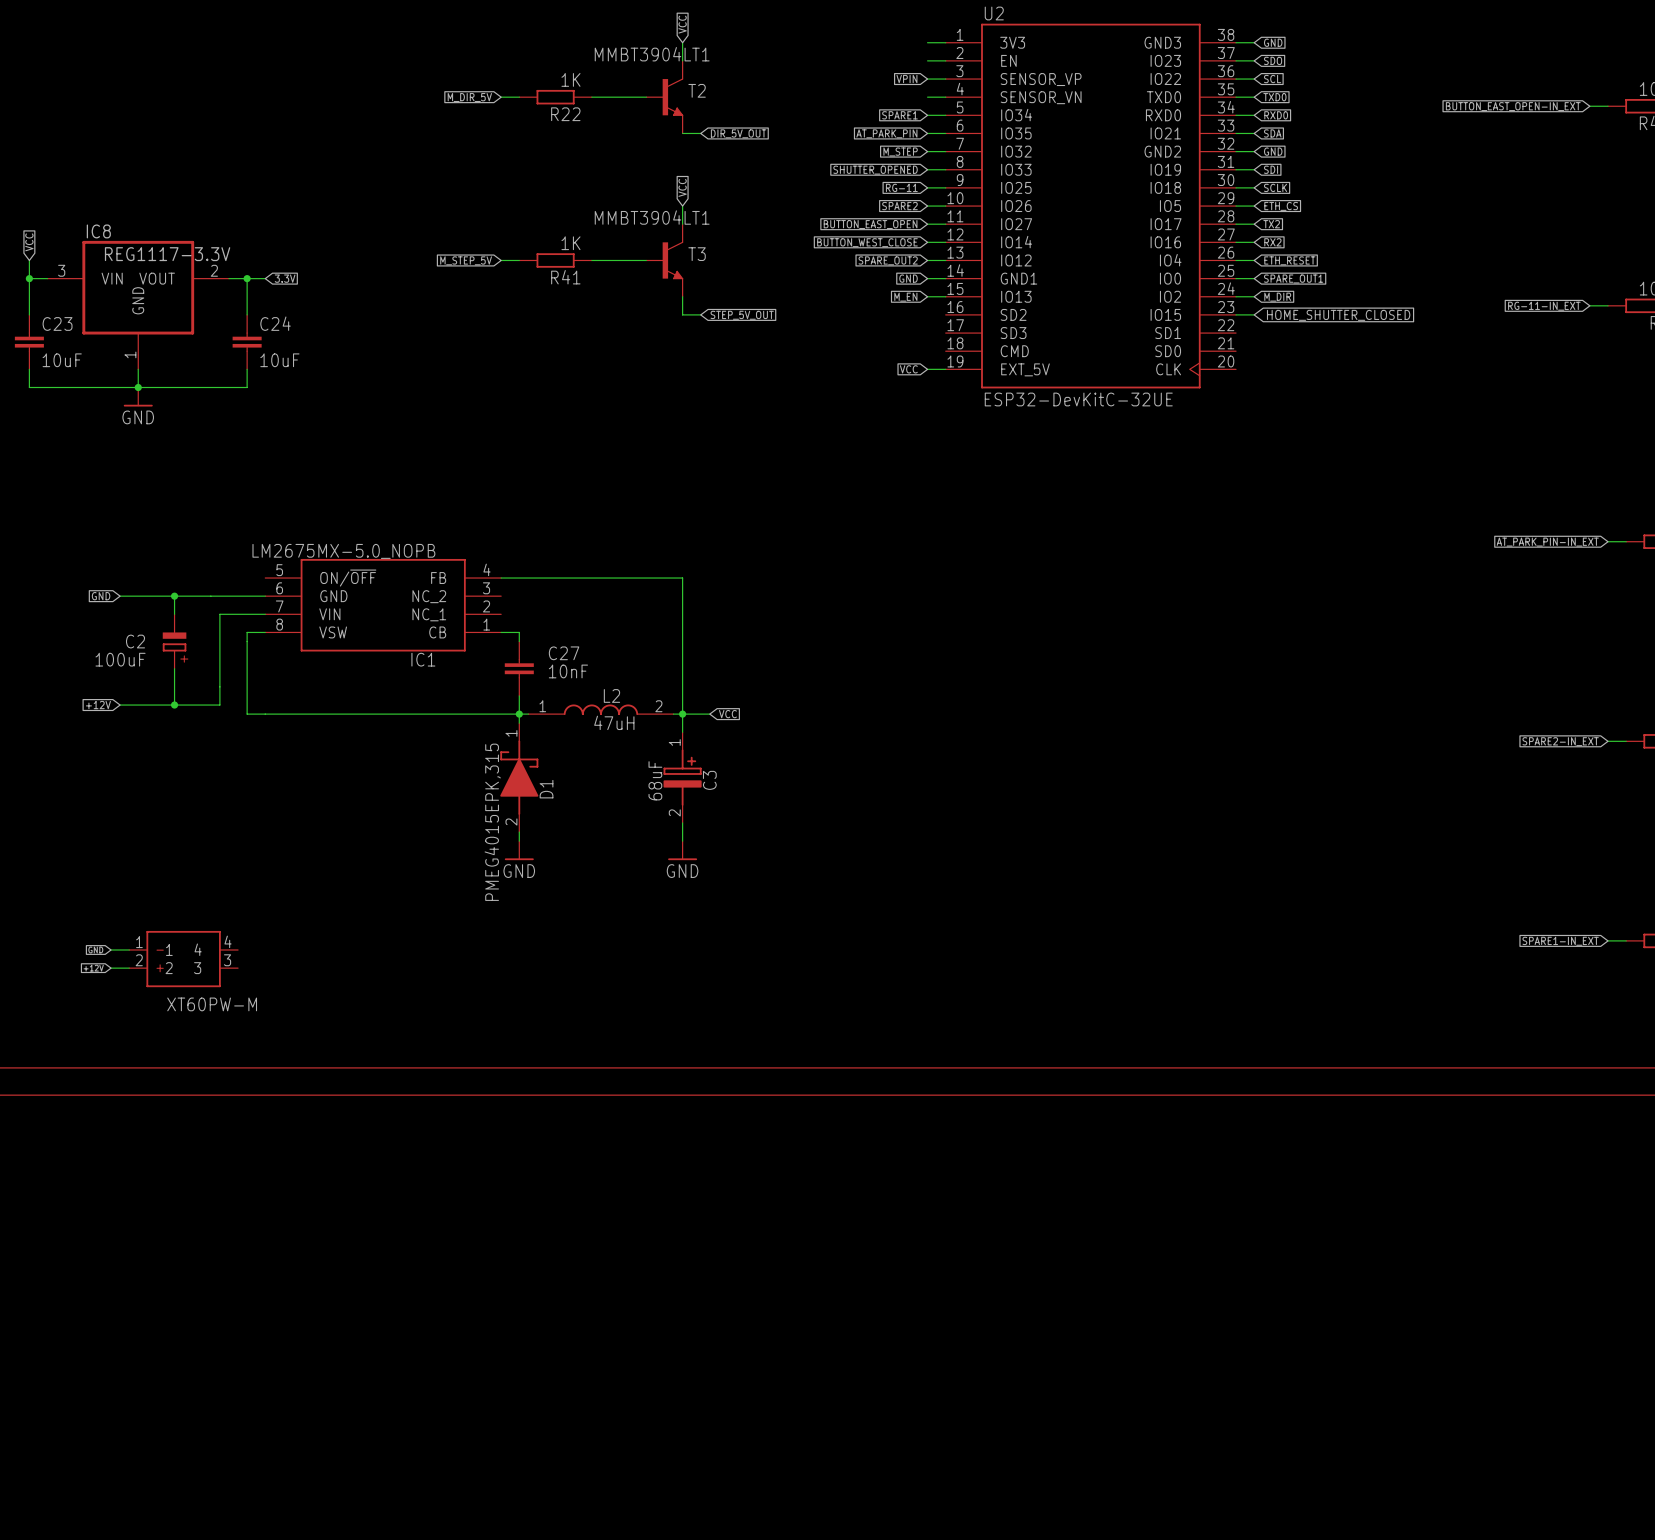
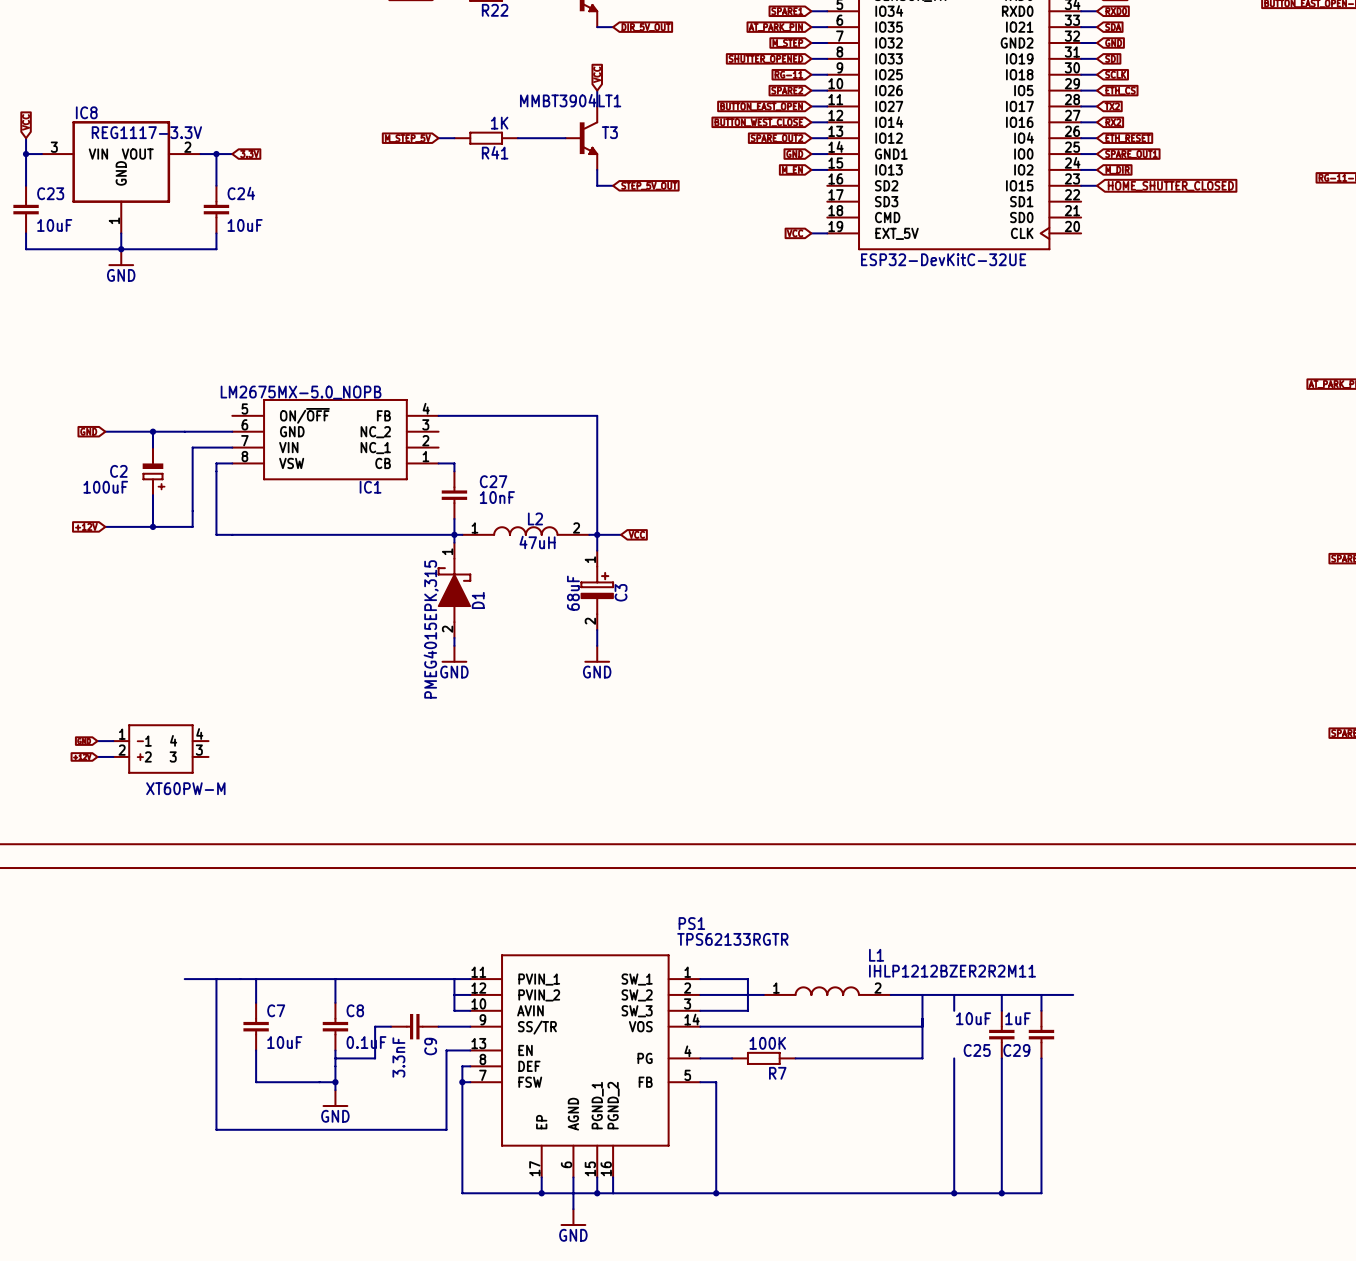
wire: none -> (184, 979) (470, 979)
wire: none -> (216, 979) (216, 1129) (446, 1129) (446, 1050) (470, 1050)
wire: none -> (256, 979) (256, 1002)
wire: none -> (335, 979) (335, 1002)
wire: none -> (454, 979) (454, 1010) (470, 1010)
wire: none -> (700, 979) (747, 979) (747, 1010) (700, 1010)
L1: none -> IHLP1212BZER2R2M11 (827, 991)
wire: none -> (454, 994) (470, 994)
wire: none -> (700, 994) (763, 994)
wire: none -> (890, 994) (1073, 994)
wire: none -> (922, 994) (922, 1058) (795, 1058)
wire: none -> (954, 994) (954, 1010)
wire: none -> (1001, 994) (1001, 1010)
wire: none -> (1041, 994) (1041, 1010)
C7: none -> 10uF (256, 1026)
C8: none -> 0.1uF (335, 1026)
wire: none -> (390, 1026) (375, 1026) (375, 1058) (335, 1058)
C9: none -> 3.3nF (414, 1026)
wire: none -> (438, 1026) (470, 1026)
wire: none -> (700, 1026) (922, 1026)
C25: none -> 10uF (1001, 1034)
C29: none -> 1uF (1041, 1034)
wire: none -> (256, 1050) (256, 1082) (335, 1082)
wire: none -> (335, 1050) (335, 1090)
wire: none -> (700, 1058) (732, 1058)
R7: none -> 100K (763, 1058)
wire: none -> (954, 1058) (954, 1193)
wire: none -> (1001, 1058) (1001, 1193)
wire: none -> (1041, 1058) (1041, 1193) (462, 1193) (462, 1066) (470, 1066)
PS1: none -> TPS62133RGTR (585, 1065)
junction: none -> (335, 1082)
wire: none -> (462, 1082) (470, 1082)
junction: none -> (462, 1082)
wire: none -> (700, 1082) (716, 1082) (716, 1193)
power symbol: none -> GND (335, 1098)
wire: none -> (541, 1177) (541, 1193)
wire: none -> (573, 1177) (573, 1209)
wire: none -> (597, 1177) (597, 1193)
wire: none -> (613, 1177) (613, 1193)
junction: none -> (541, 1193)
junction: none -> (597, 1193)
junction: none -> (716, 1193)
junction: none -> (954, 1193)
junction: none -> (1001, 1193)
power symbol: none -> GND (573, 1217)

